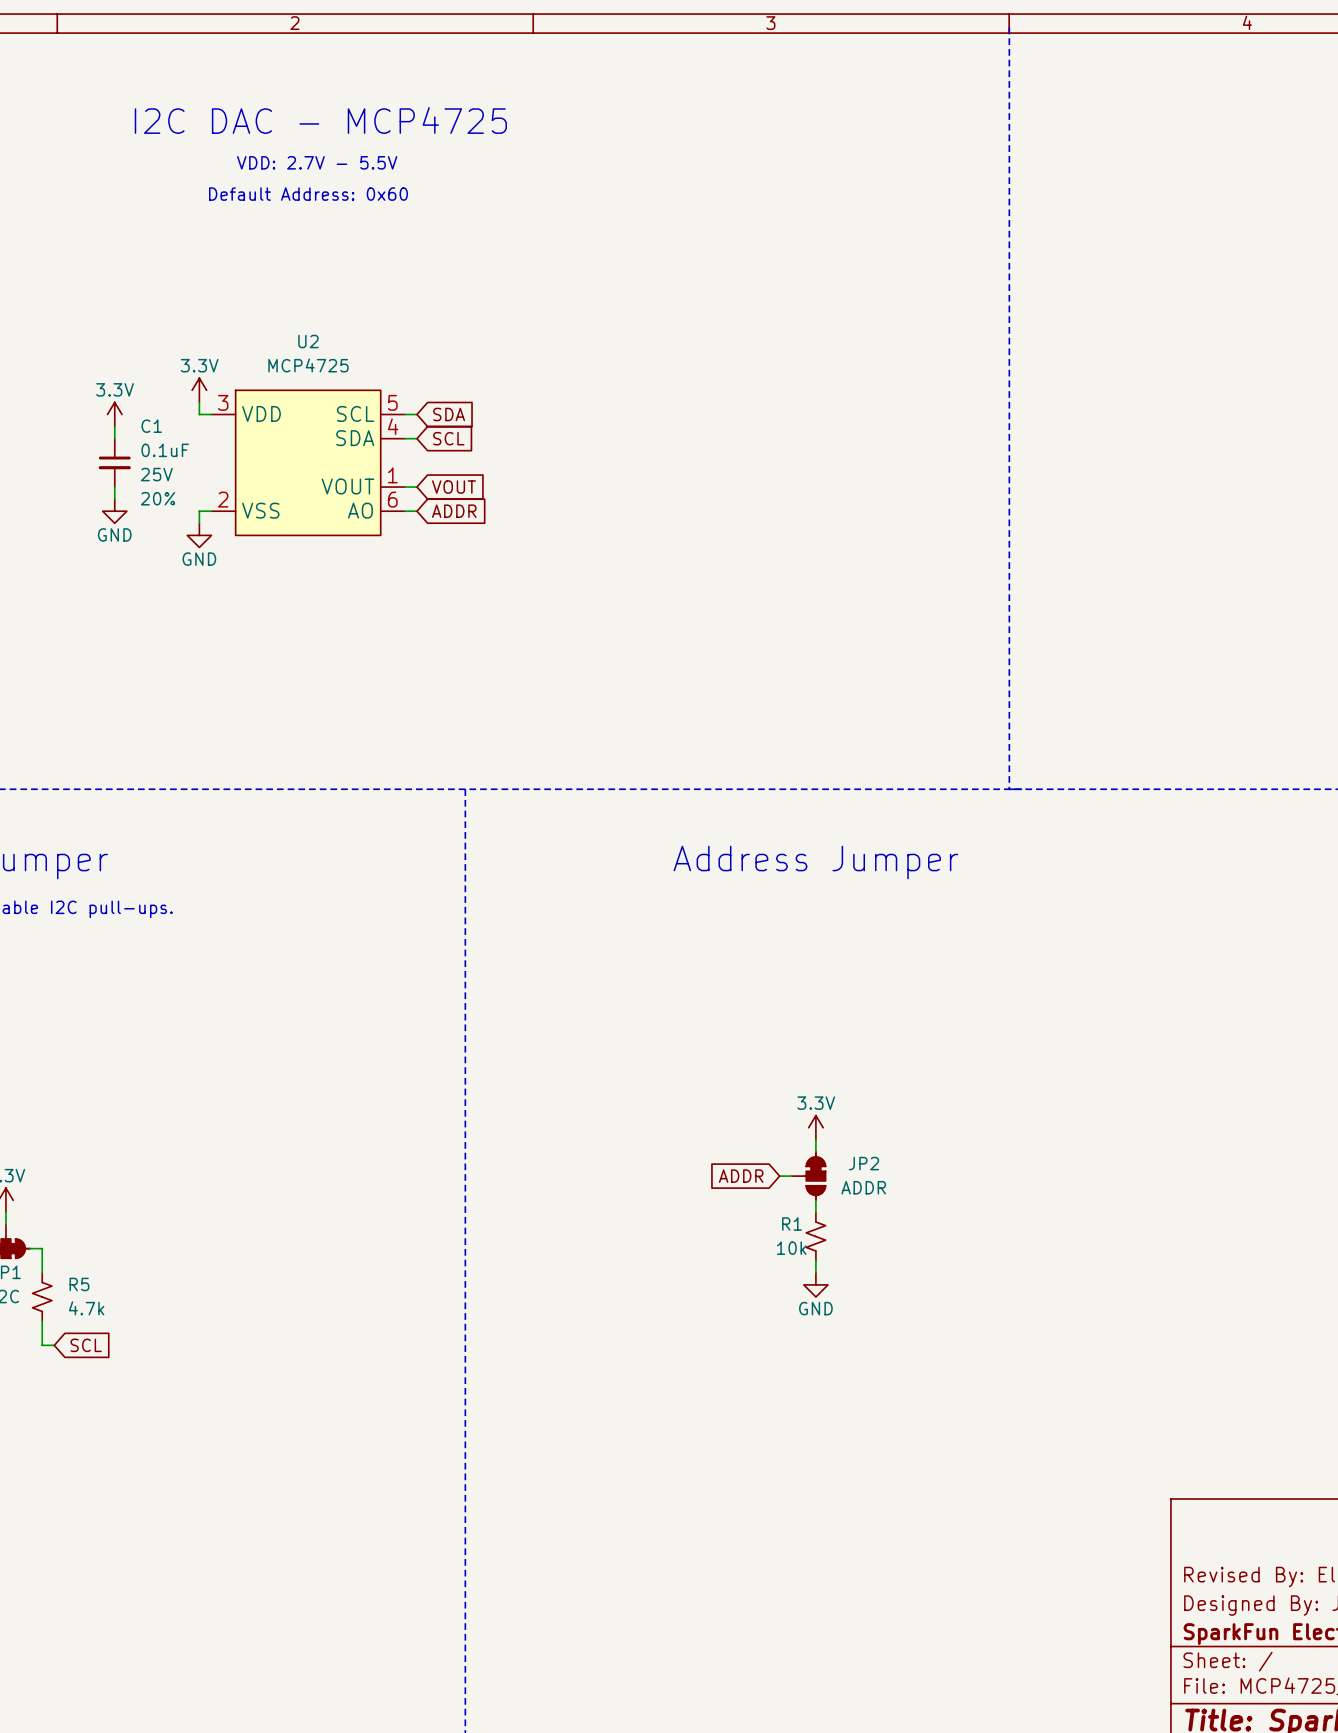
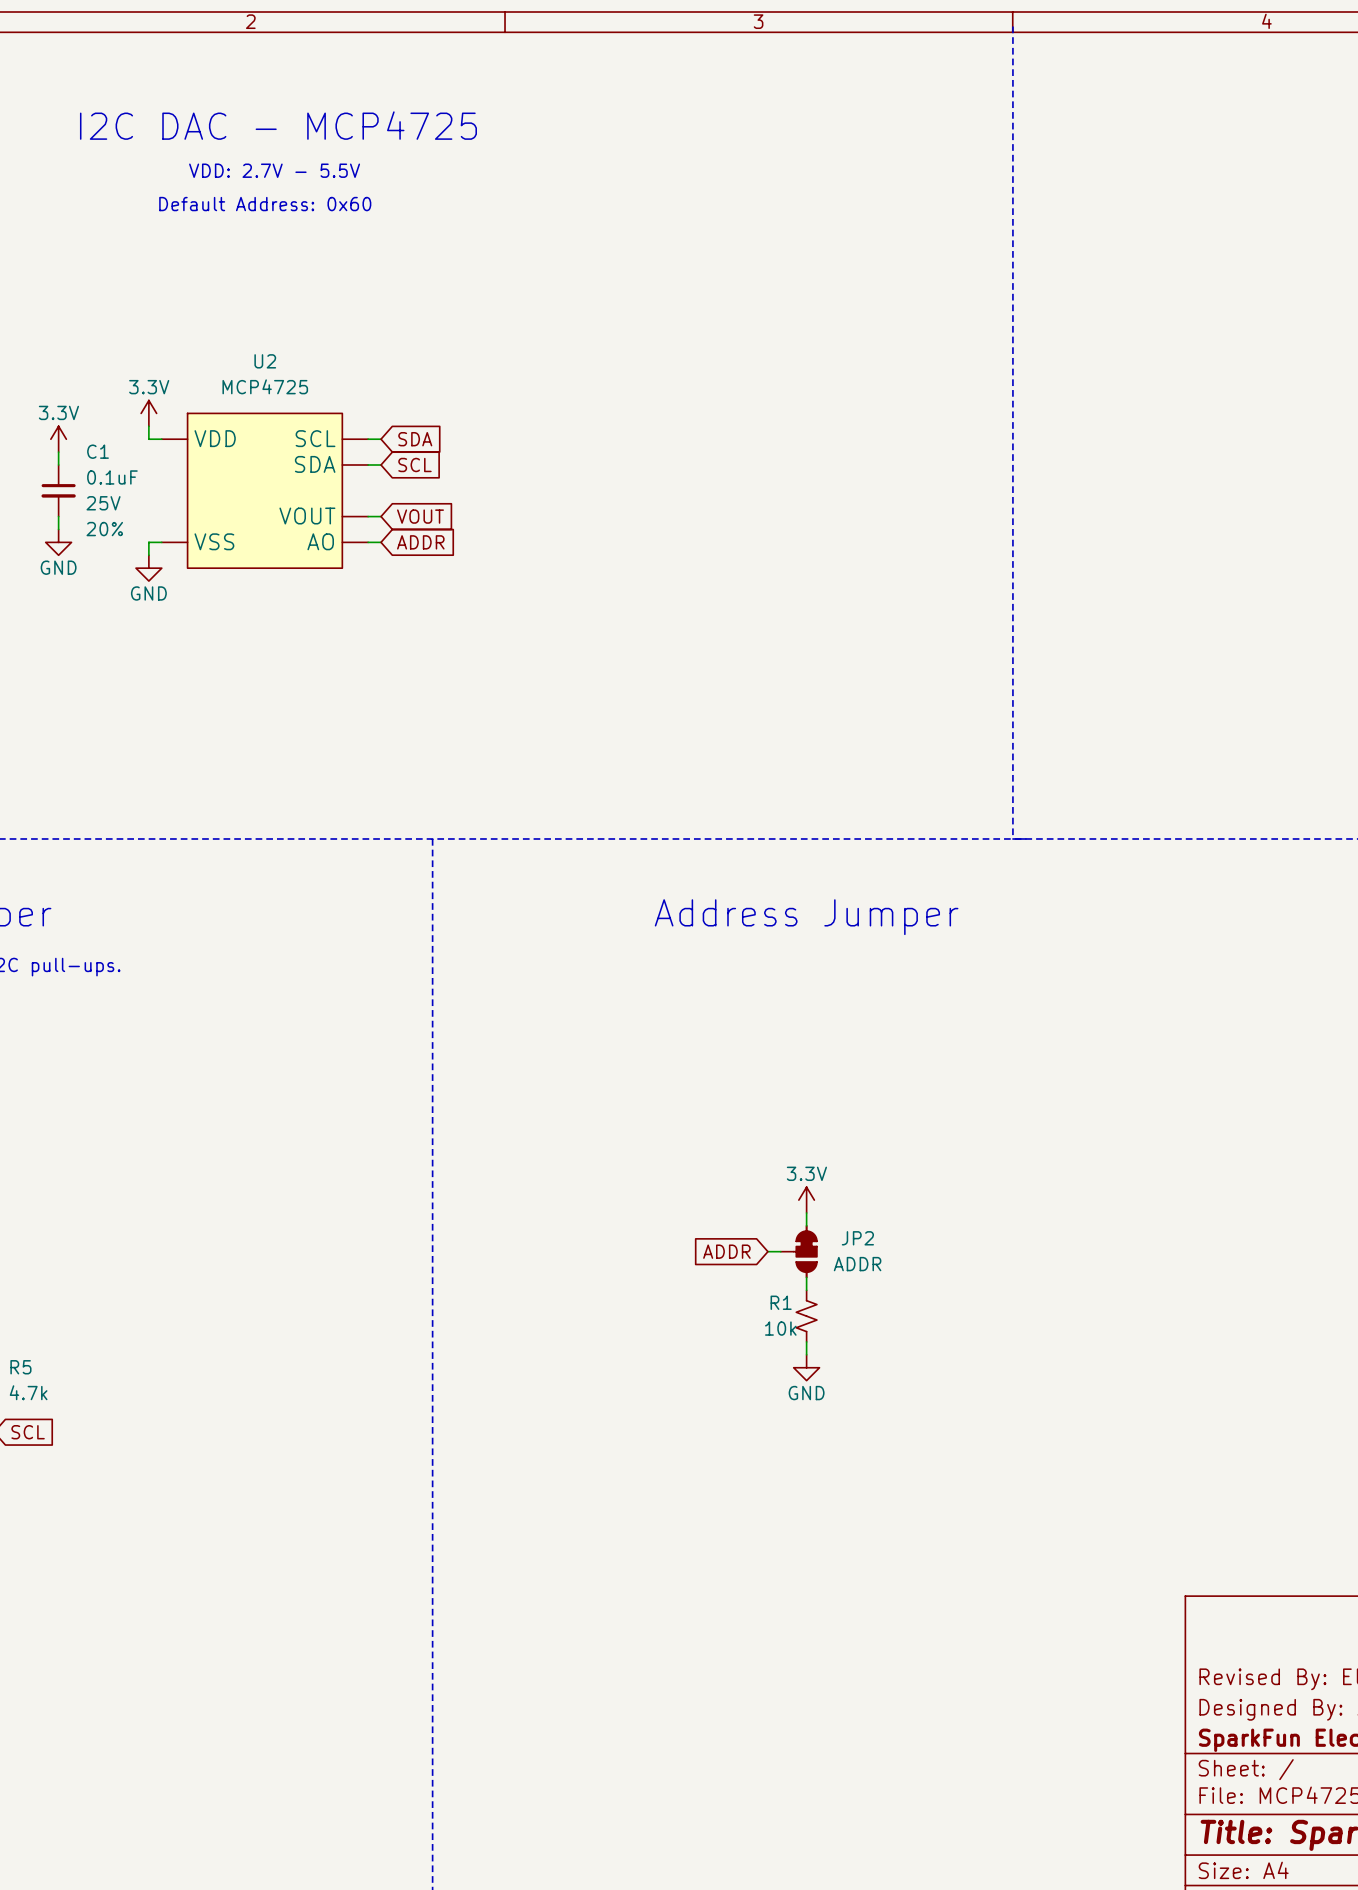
U2 pin number: 3 (223, 402) -> none
U2 pin number: 5 (392, 402) -> none
U2 pin number: 4 (393, 426) -> none
U2 pin number: 1 (392, 475) -> none
U2 pin number: 2 (223, 499) -> none
U2 pin number: 6 (392, 499) -> none

